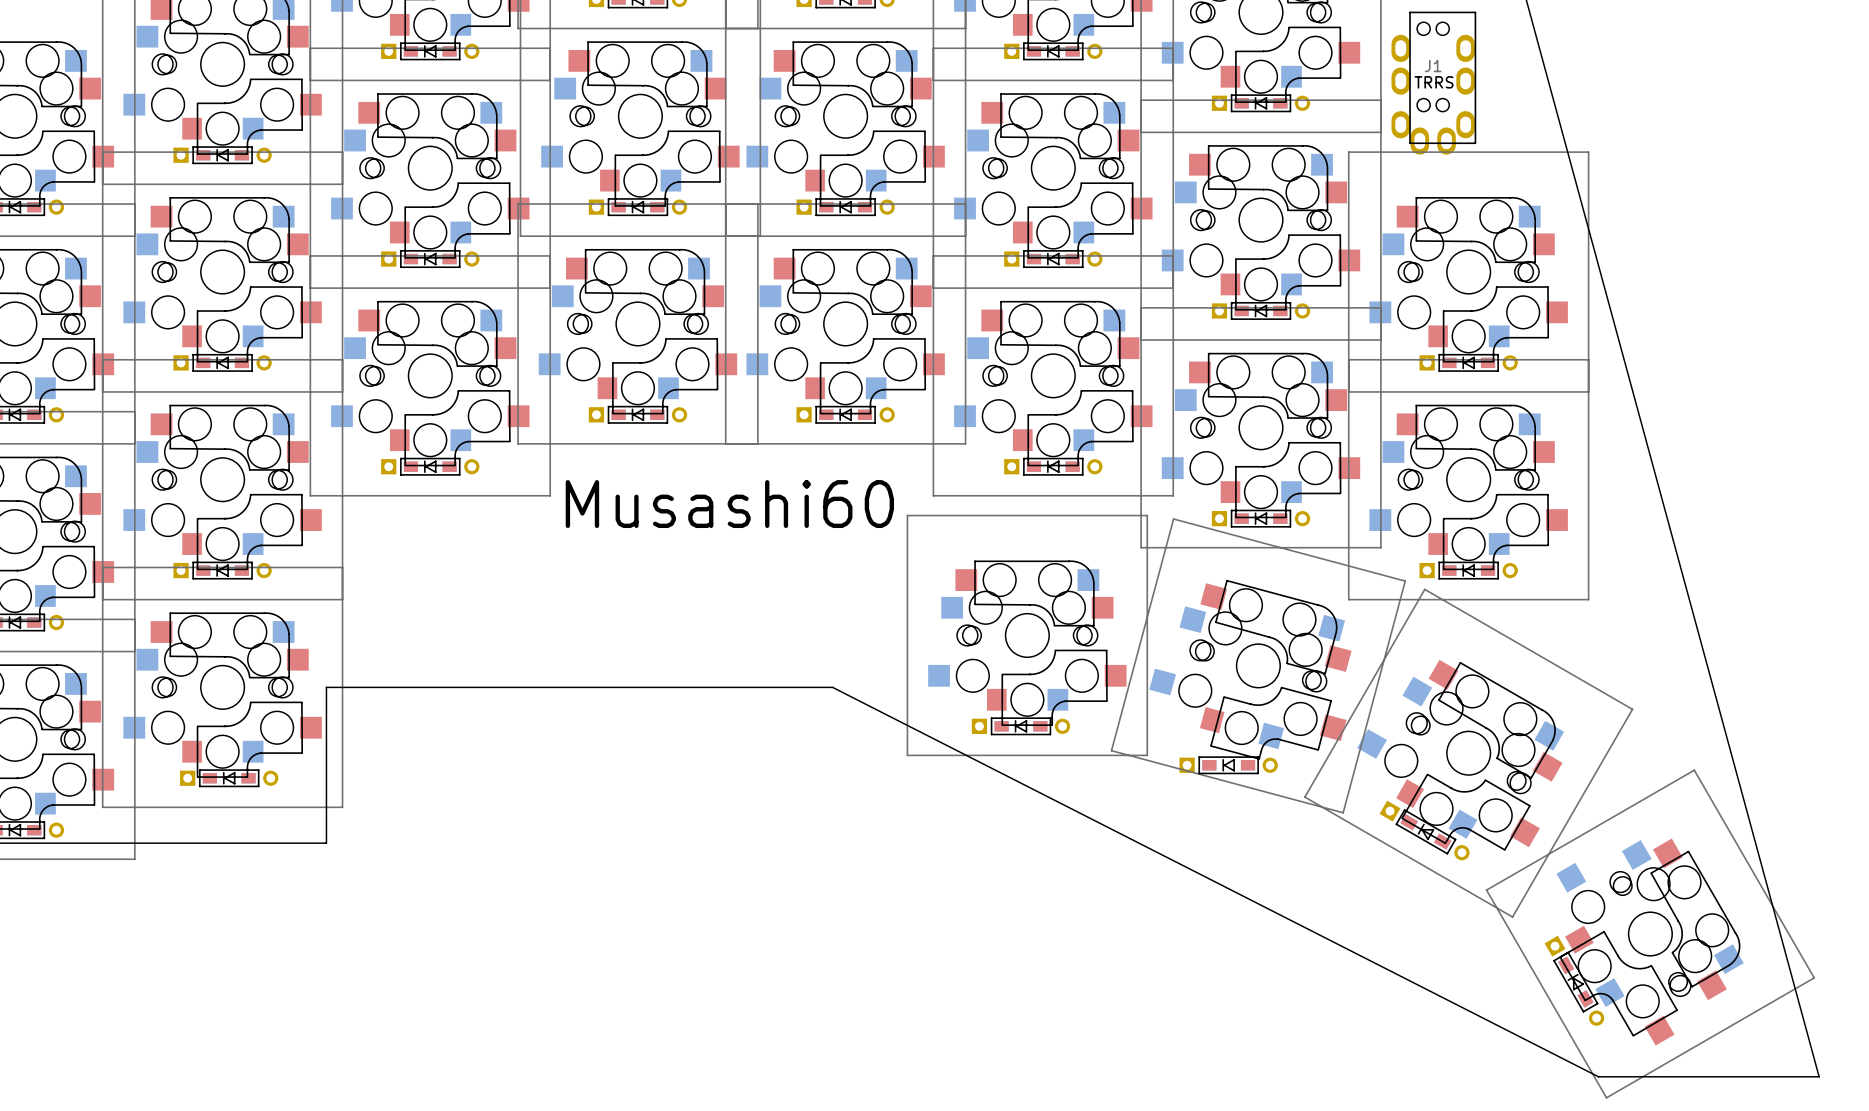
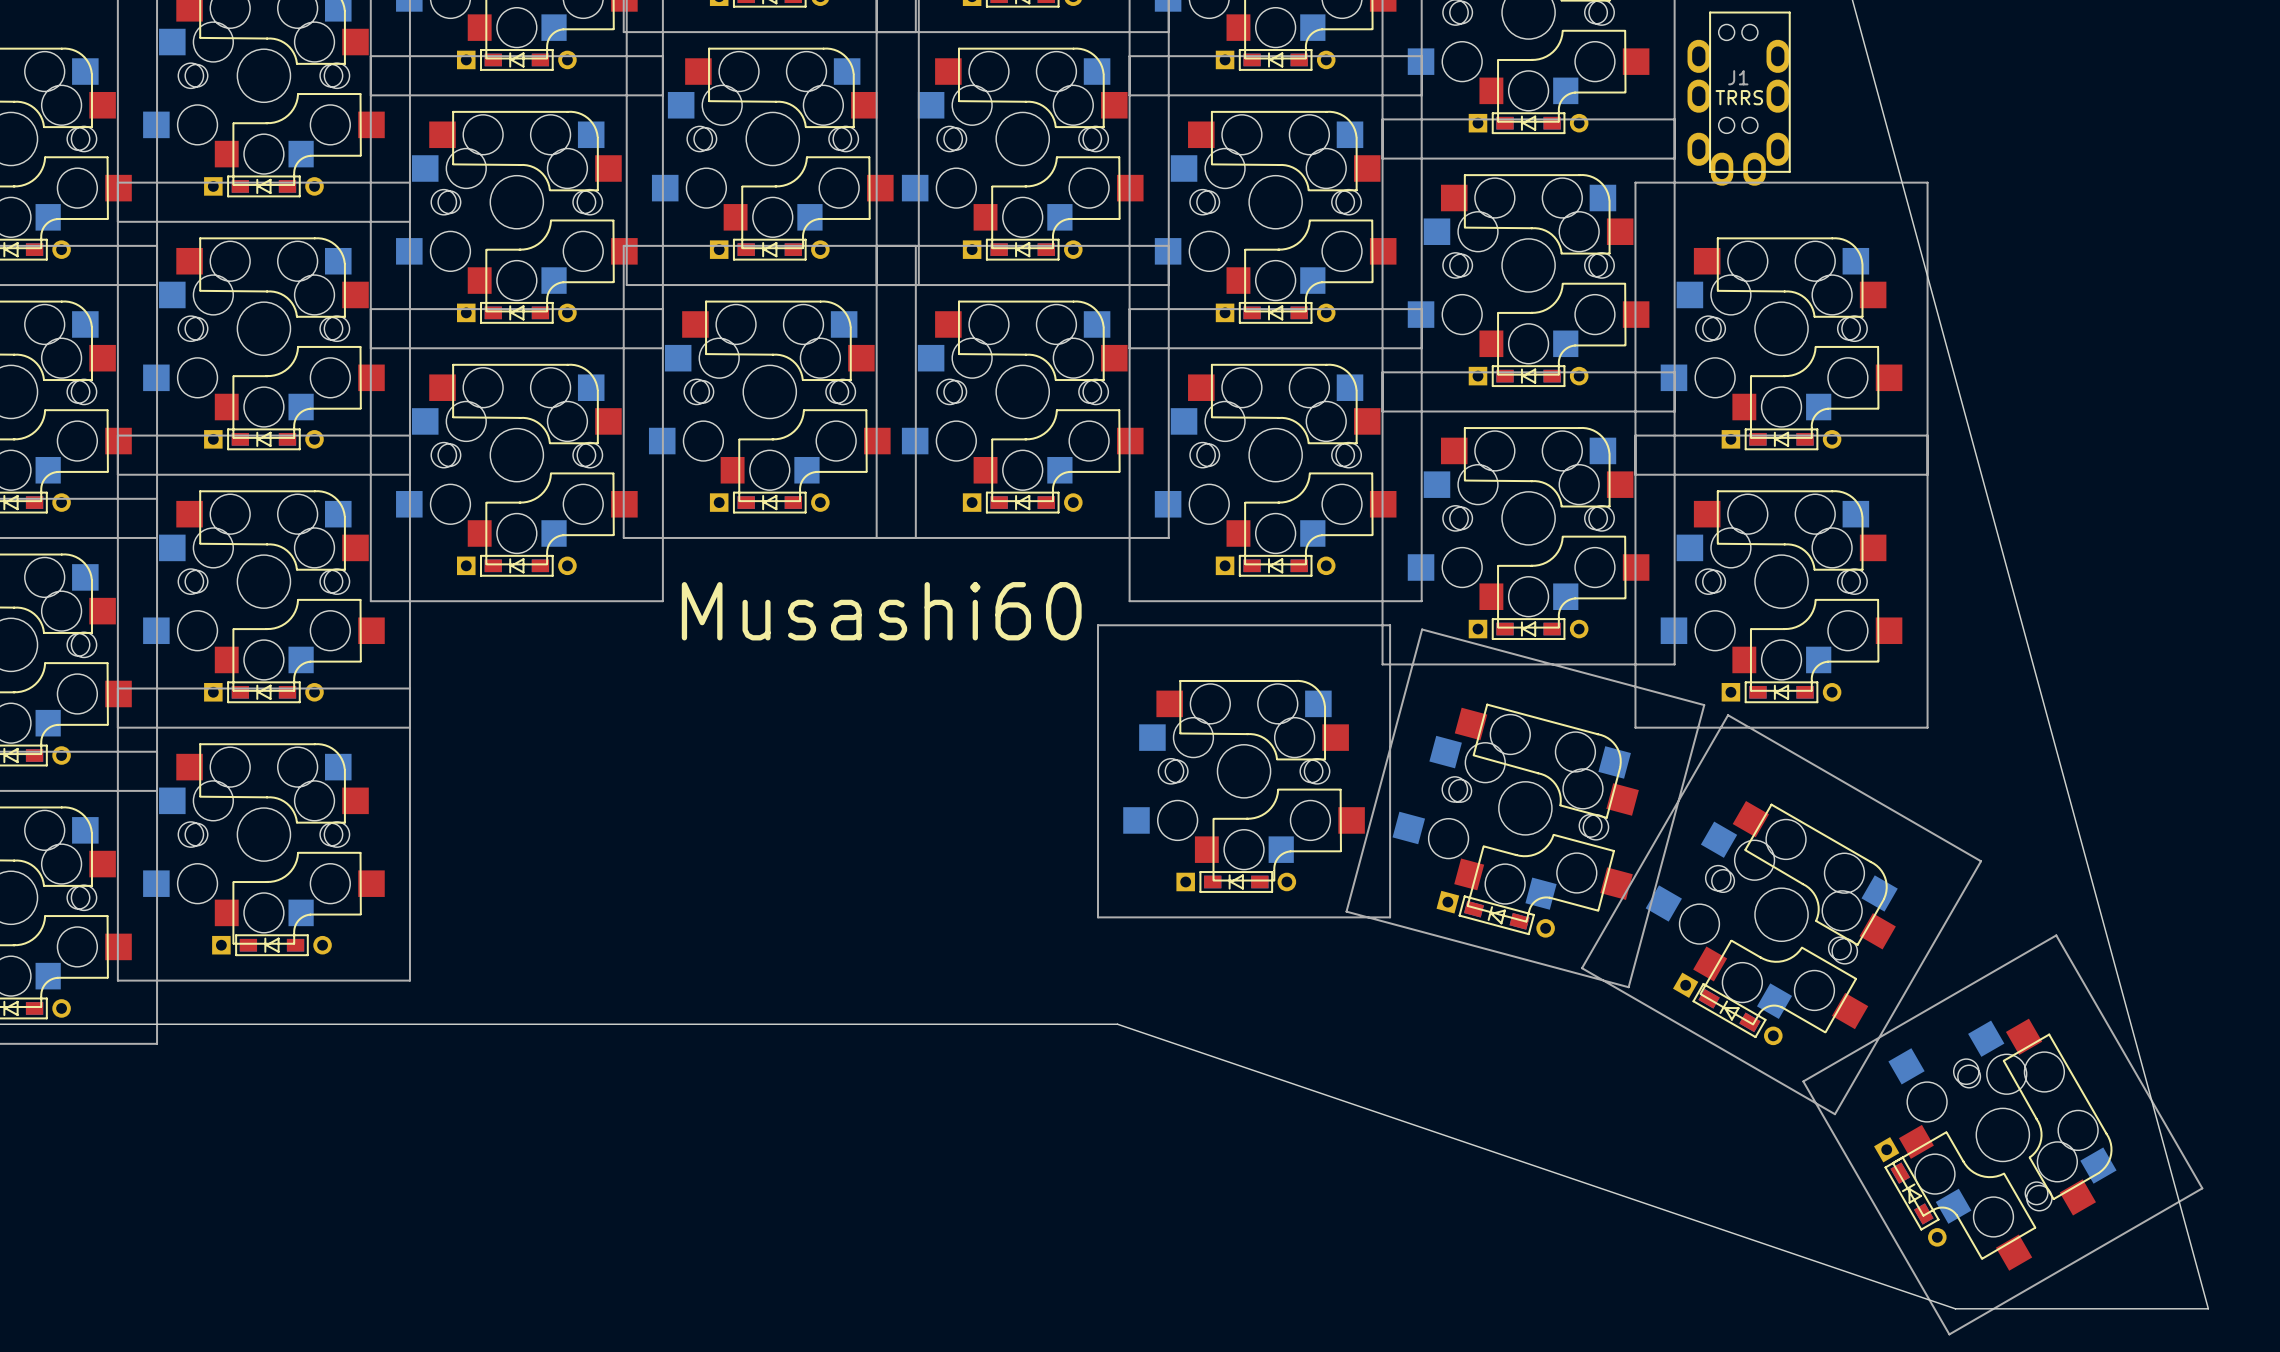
part: none -> (1495, 914)
part: (1228, 765) -> none
board edge: (326, 843) (326, 687) (832, 687) (1598, 1076) (1819, 1076) -> (390, 1024) (1117, 1024) (1955, 1308) (2208, 1308)

